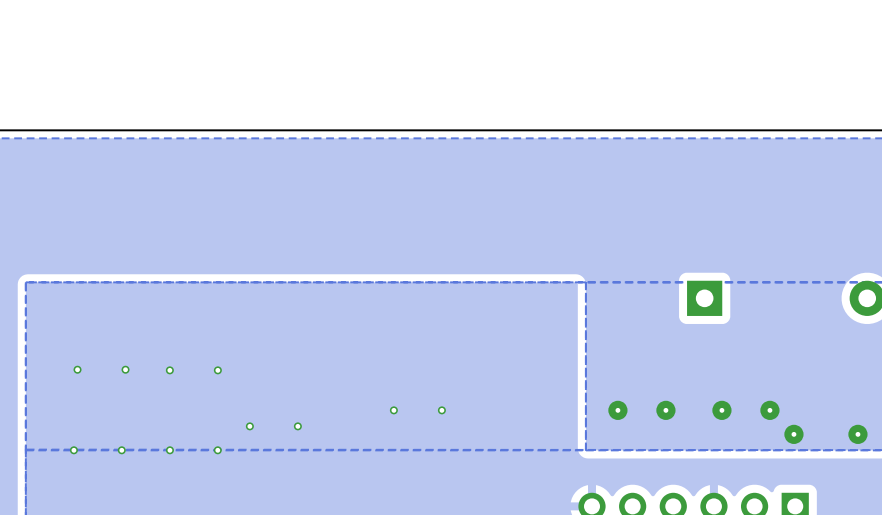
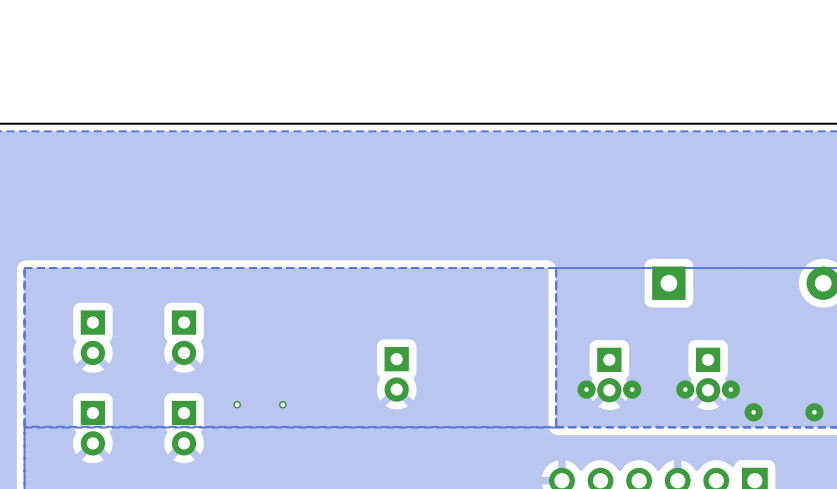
part: none -> (92, 337)
part: none -> (184, 337)
via: (77, 369) -> none
via: (125, 369) -> none
via: (169, 370) -> none
via: (217, 370) -> none
part: none -> (396, 374)
part: none -> (609, 375)
part: none -> (708, 375)
via: (393, 410) -> none
via: (441, 410) -> none
via: (73, 450) -> none
via: (121, 450) -> none
via: (169, 450) -> none
via: (217, 450) -> none
part: none -> (92, 428)
part: none -> (184, 428)

